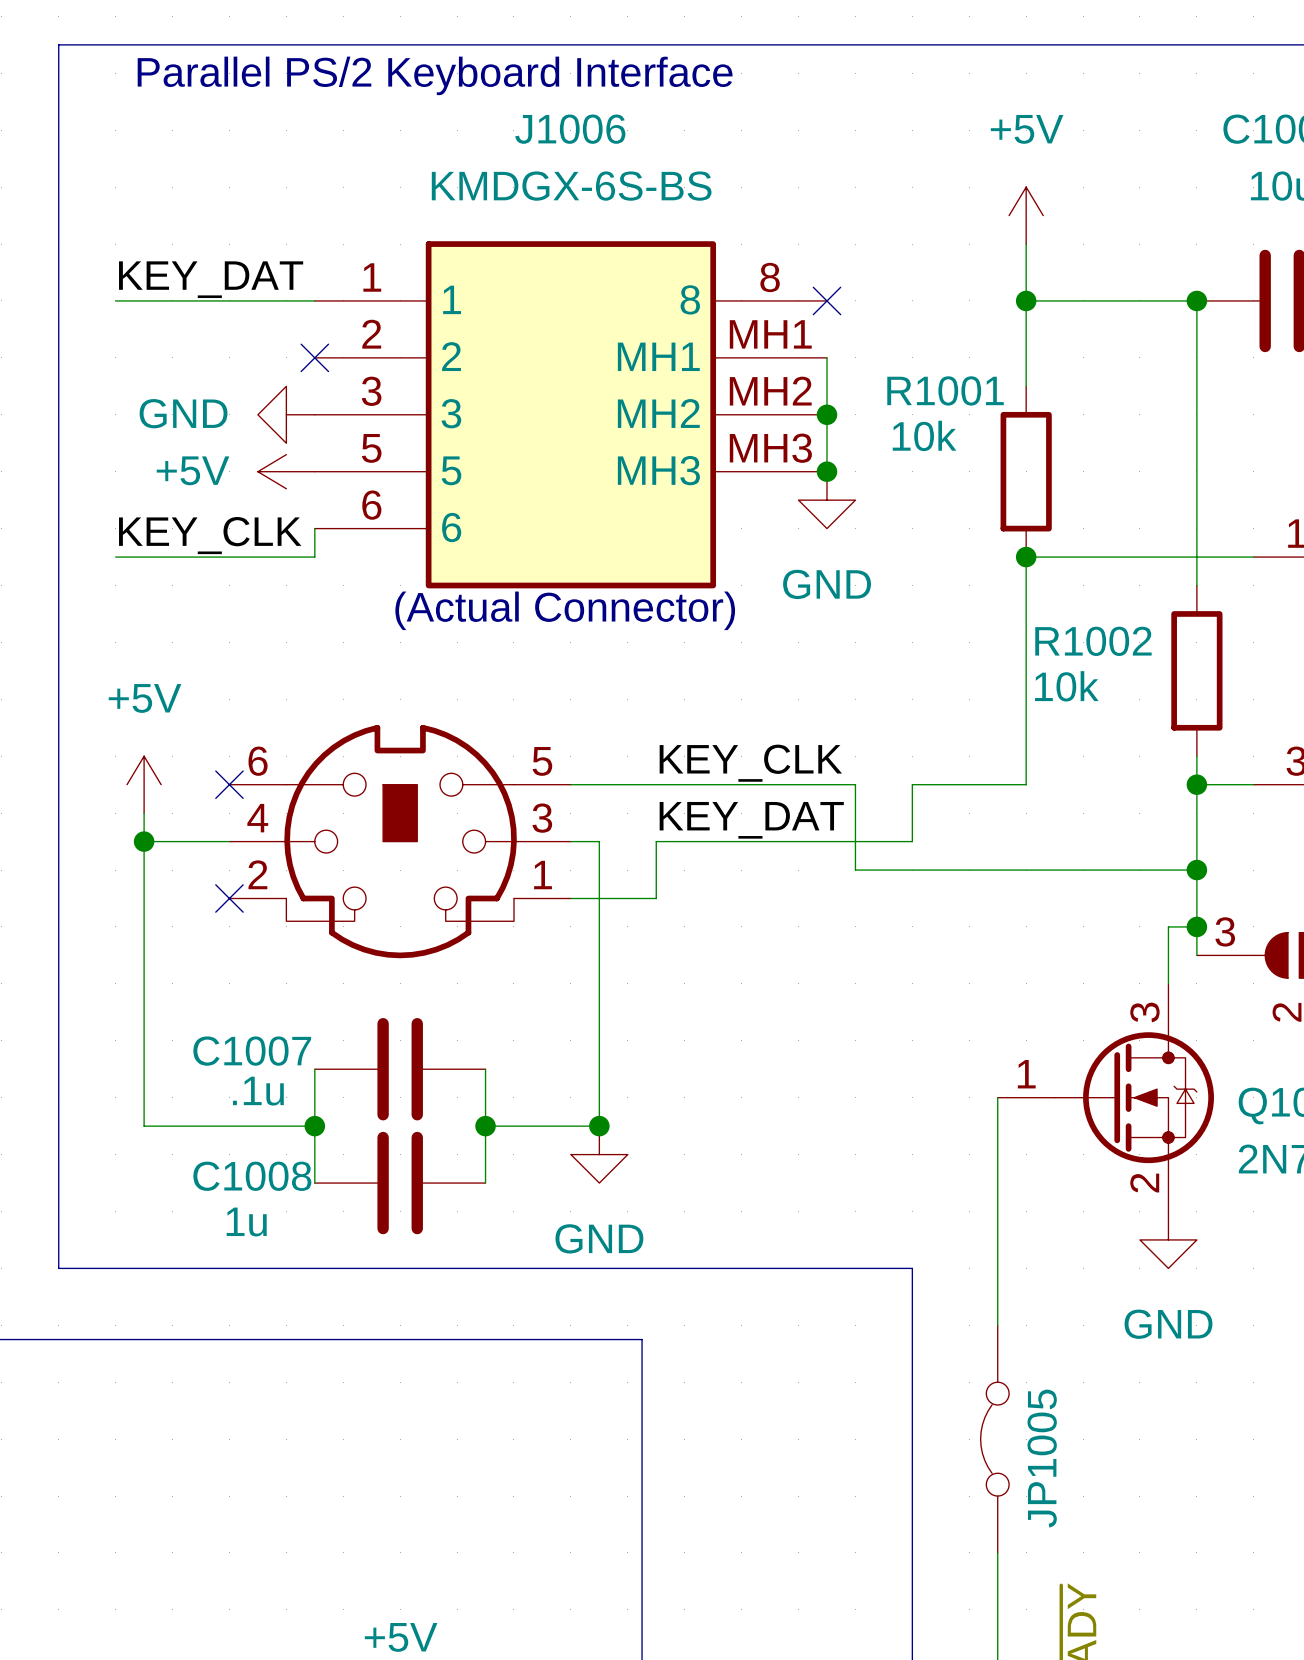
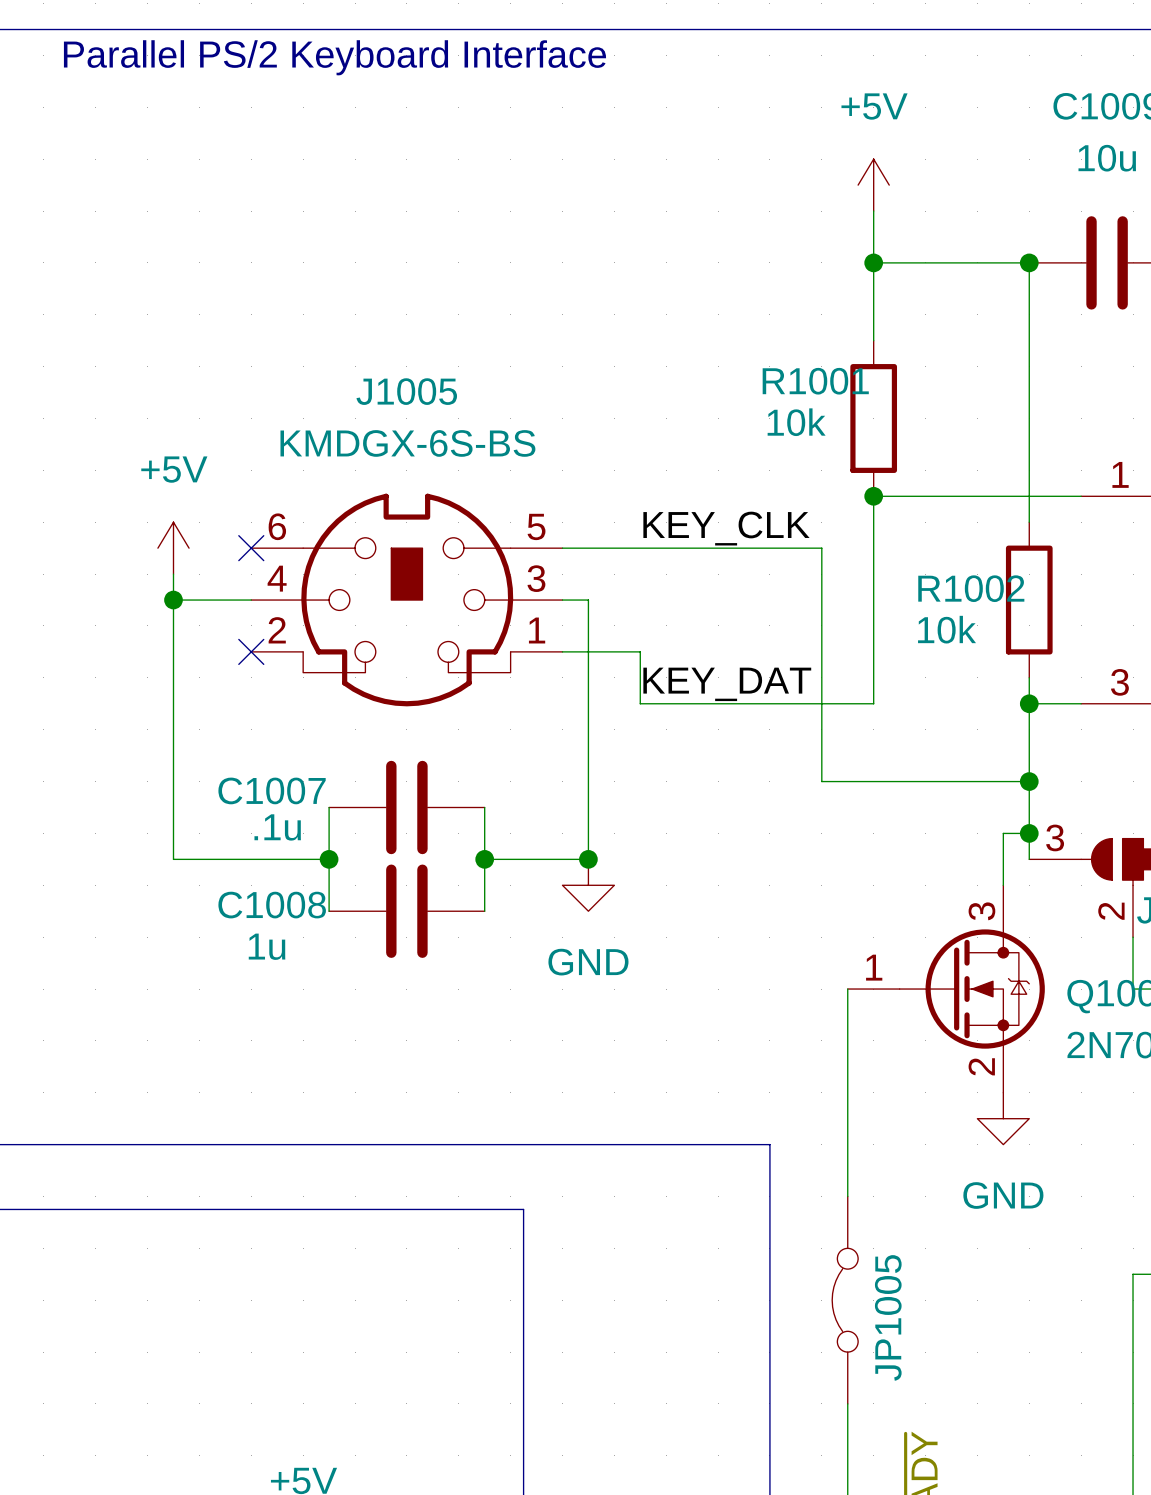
label: KEY_DAT (211, 279) -> none
wire: (115, 300) (314, 300) -> none
no-connect mark: (826, 300) -> none
no-connect mark: (314, 357) -> none
wire: (826, 357) (826, 471) -> none
R1001 name position: R1001 (945, 390) -> R1001 (815, 381)
power symbol: GND (286, 414) -> none
J1006: KMDGX-6S-BS (570, 414) -> none
junction: (826, 414) -> none
R1001 value position: 10k (924, 435) -> 10k (796, 422)
power symbol: +5V (286, 471) -> none
junction: (826, 471) -> none
power symbol: GND (826, 500) -> none
wire: (314, 528) (314, 557) (115, 557) -> none
label: KEY_CLK (210, 535) -> none
text: (Actual Connector) (565, 610) -> none
power symbol: none -> +5V (173, 548)
no-connect mark: none -> (251, 548)
wire: none -> (562, 548) (821, 548) (821, 781)
R1002 name position: R1002 (1093, 641) -> R1002 (971, 588)
junction: none -> (173, 600)
J1005: none -> KMDGX-6S-BS (406, 600)
wire: none -> (562, 600) (588, 600) (588, 859) (484, 859)
R1002 value position: 10k (1066, 686) -> 10k (947, 629)
no-connect mark: none -> (251, 651)
label position: KEY_CLK (750, 763) -> KEY_CLK (726, 528)
power symbol: +5V (144, 784) -> none
no-connect mark: (229, 784) -> none
wire: (570, 784) (770, 784) -> (562, 651) (640, 651) (640, 703)
wire: (855, 784) (855, 870) (969, 870) -> (718, 703) (769, 703)
wire: (912, 784) (912, 841) (656, 841) (656, 898) (570, 898) -> none
wire: (144, 813) (144, 1126) (314, 1126) -> (173, 574) (173, 859) (329, 859)
label position: KEY_DAT (751, 820) -> KEY_DAT (727, 684)
wire: (144, 841) (229, 841) -> (173, 600) (251, 600)
junction: (144, 841) -> none
part: (400, 841) -> none
wire: (570, 841) (599, 841) (599, 898) -> none
no-connect mark: (229, 898) -> none
junction: none -> (329, 859)
junction: none -> (484, 859)
junction: none -> (588, 859)
wire: (599, 1012) (599, 1126) (485, 1126) -> none
wire: (314, 1069) (314, 1183) -> (329, 807) (329, 911)
C1007 position: (400, 1069) -> (406, 807)
wire: (485, 1069) (485, 1183) -> none
junction: (314, 1126) -> none
junction: (485, 1126) -> none
junction: (599, 1126) -> none
power symbol position: GND (599, 1154) -> GND (588, 885)
C1008 position: (400, 1183) -> (406, 911)

